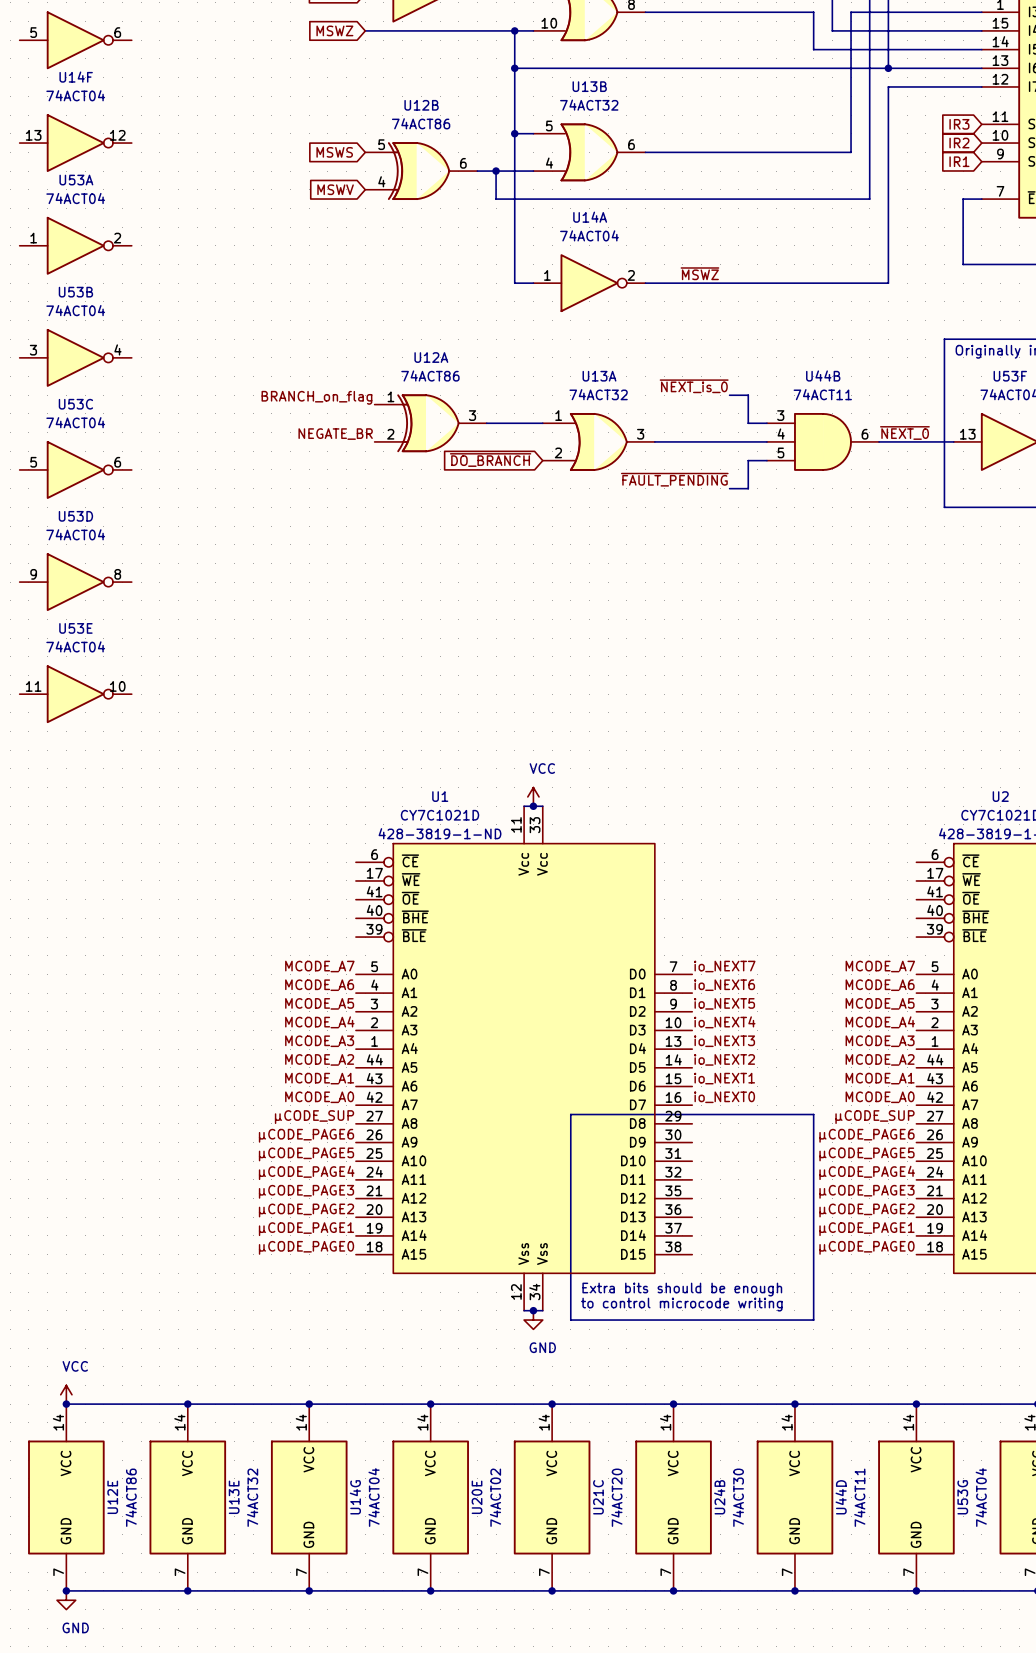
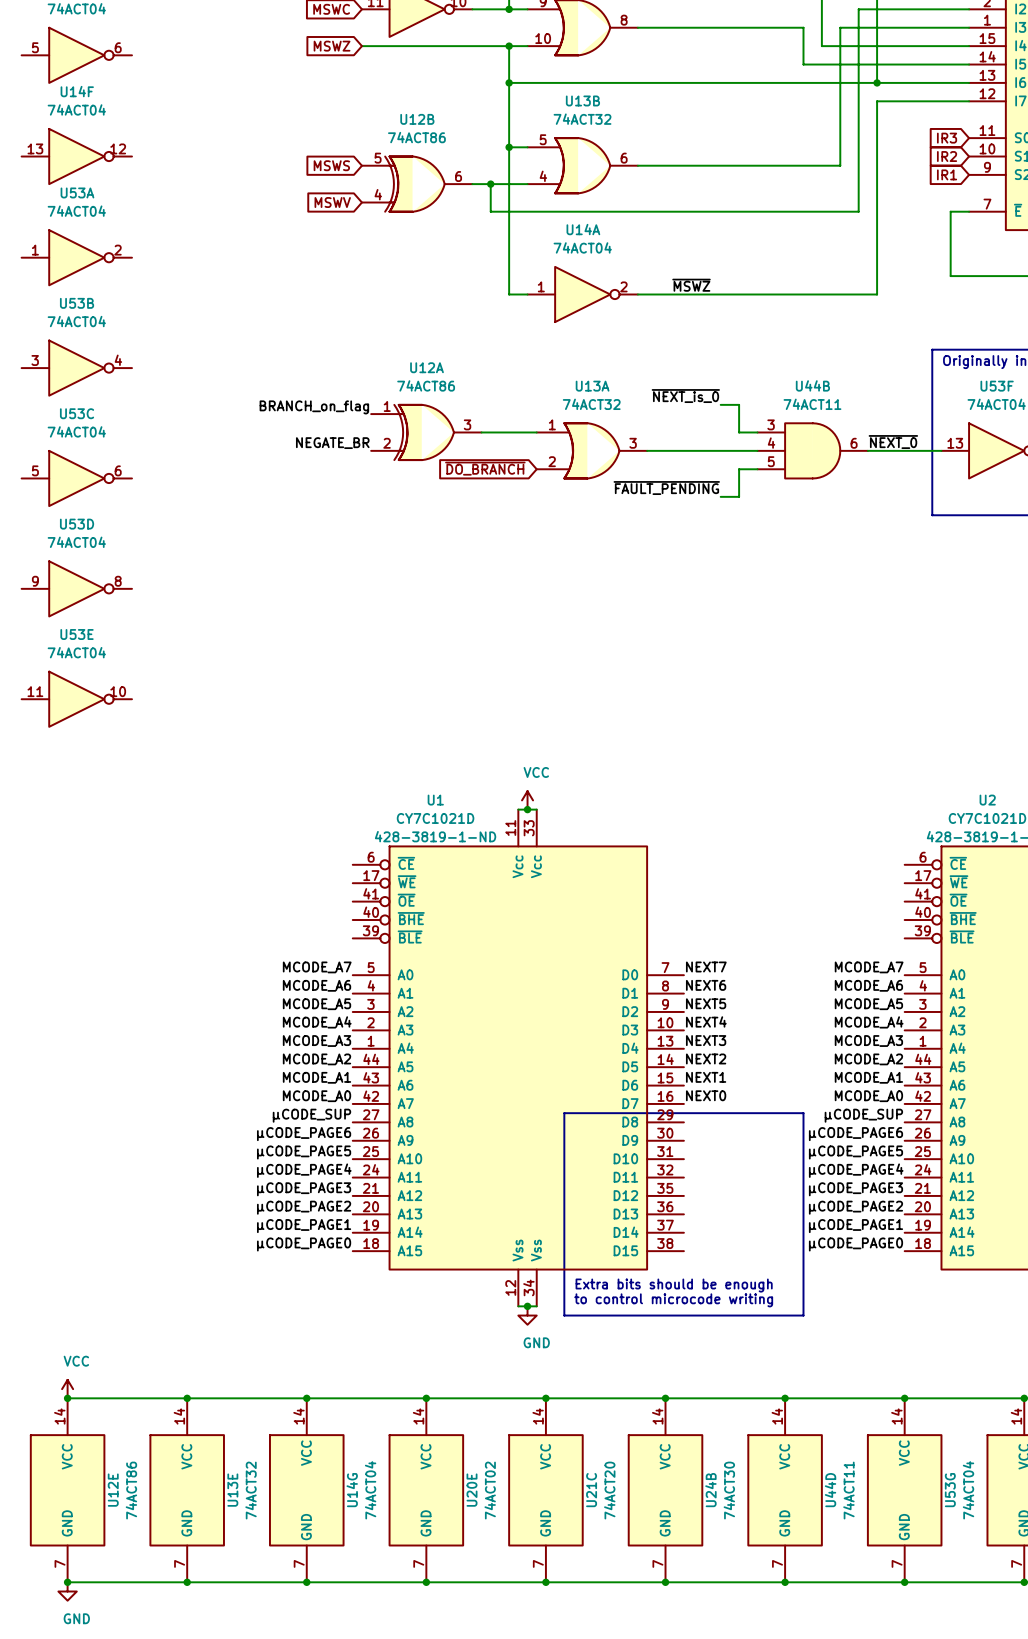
label: io_NEXT7 (724, 966) -> NEXT7 (706, 966)
label: io_NEXT6 (724, 985) -> NEXT6 (706, 985)
label: io_NEXT5 (724, 1003) -> NEXT5 (706, 1003)
label: io_NEXT4 (724, 1022) -> NEXT4 (706, 1021)
label: io_NEXT3 (724, 1041) -> NEXT3 (706, 1040)
label: io_NEXT2 (724, 1059) -> NEXT2 (706, 1058)
label: io_NEXT1 (724, 1078) -> NEXT1 (706, 1077)
label: io_NEXT0 (724, 1097) -> NEXT0 (706, 1095)

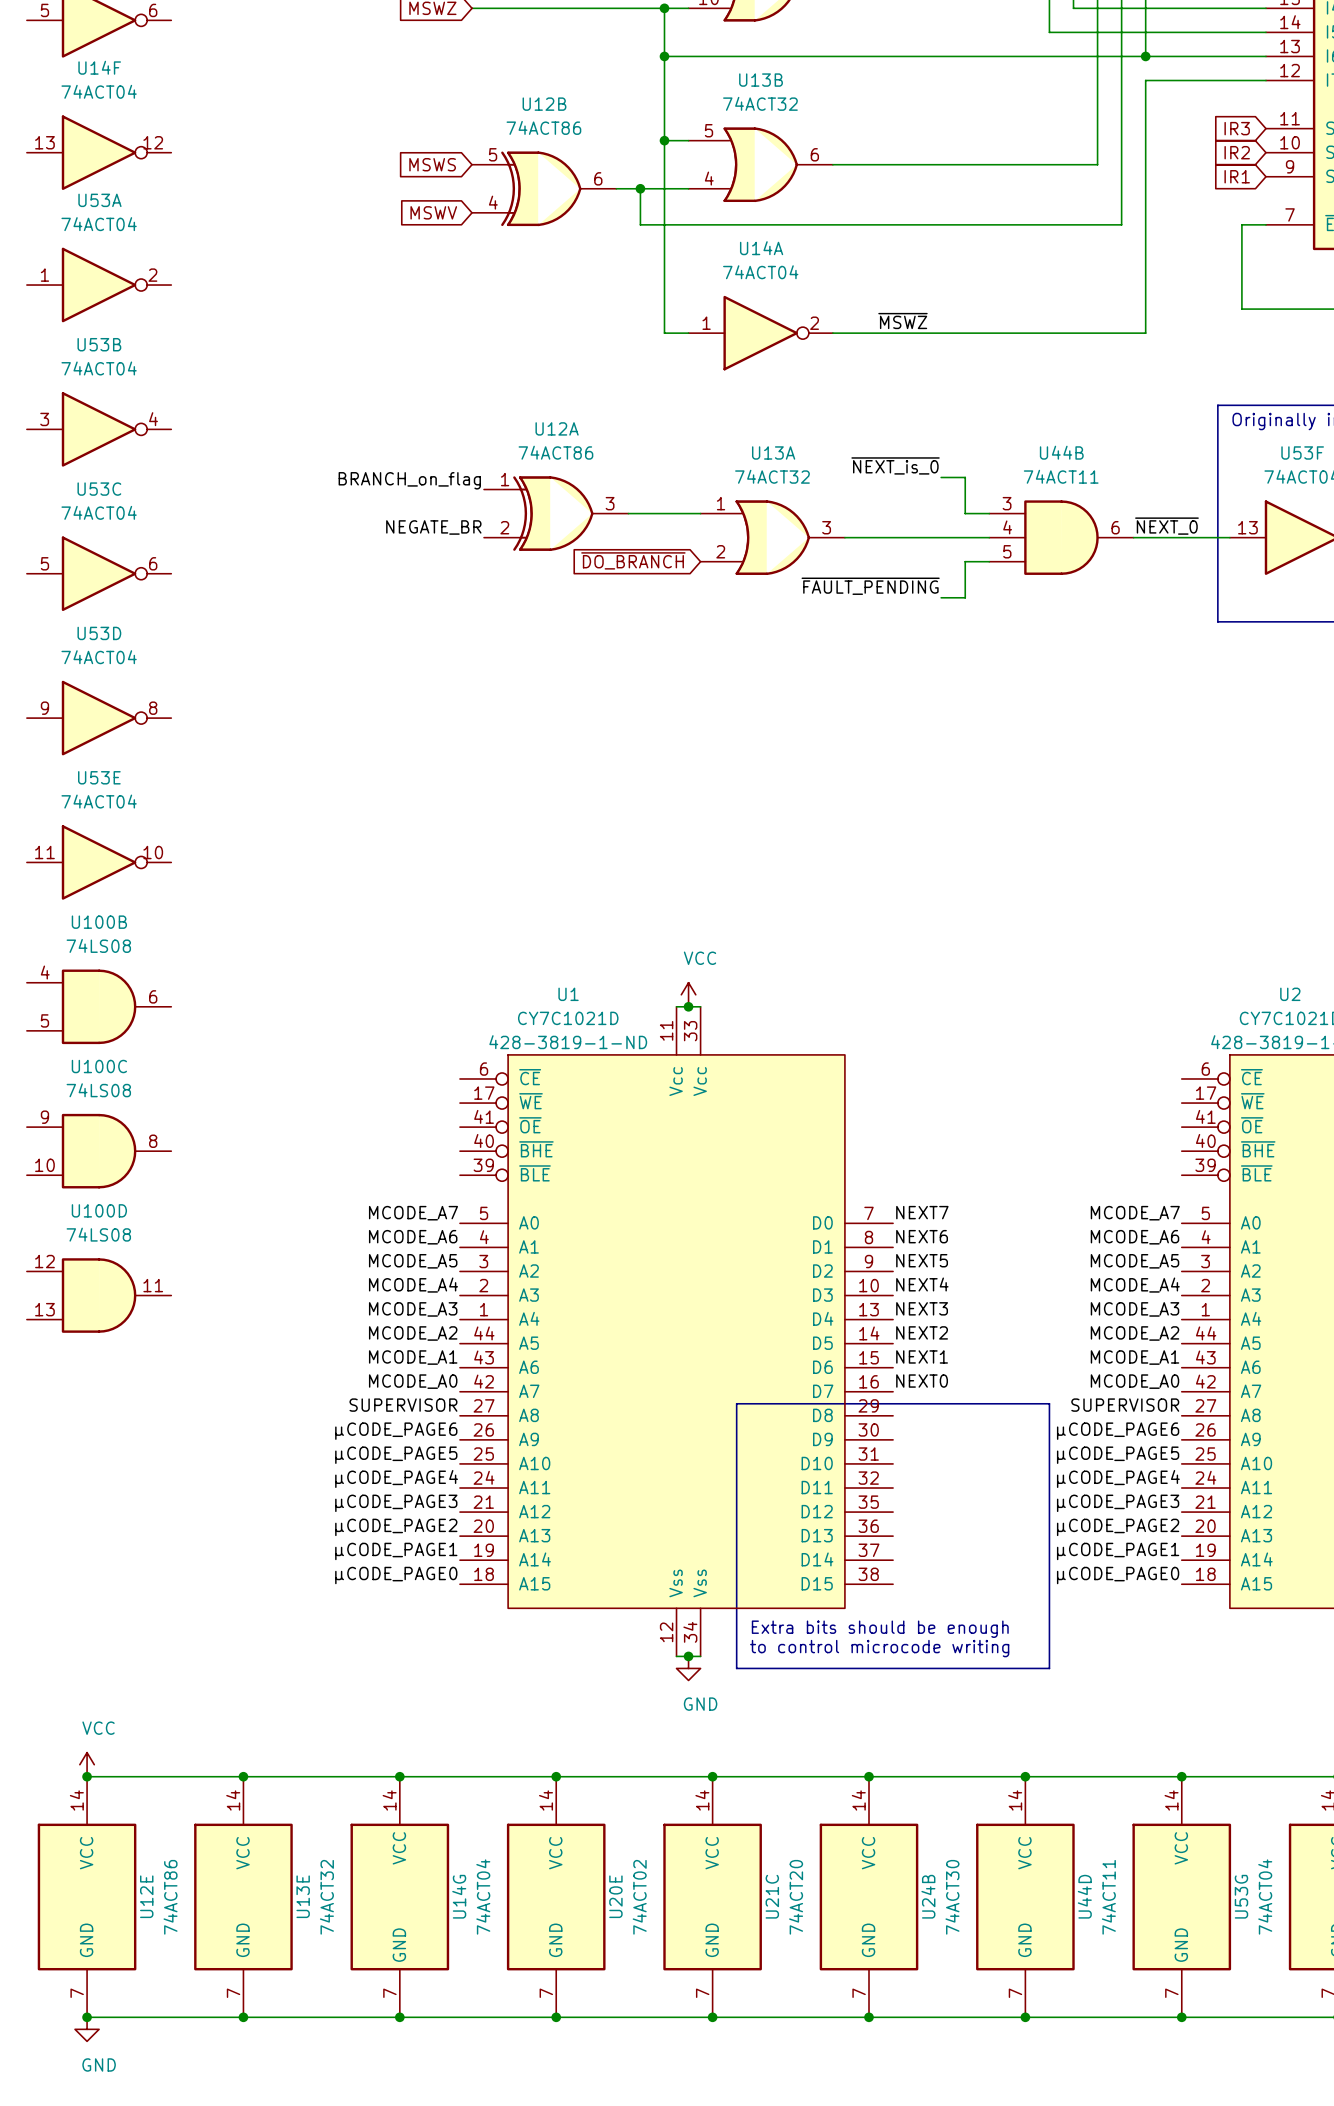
U100B: none -> 74LS08 (99, 1006)
U100C: none -> 74LS08 (99, 1151)
U100D: none -> 74LS08 (99, 1295)
label: µCODE_SUP (311, 1115) -> SUPERVISOR (403, 1405)
label: µCODE_SUP (863, 1115) -> SUPERVISOR (1125, 1405)

